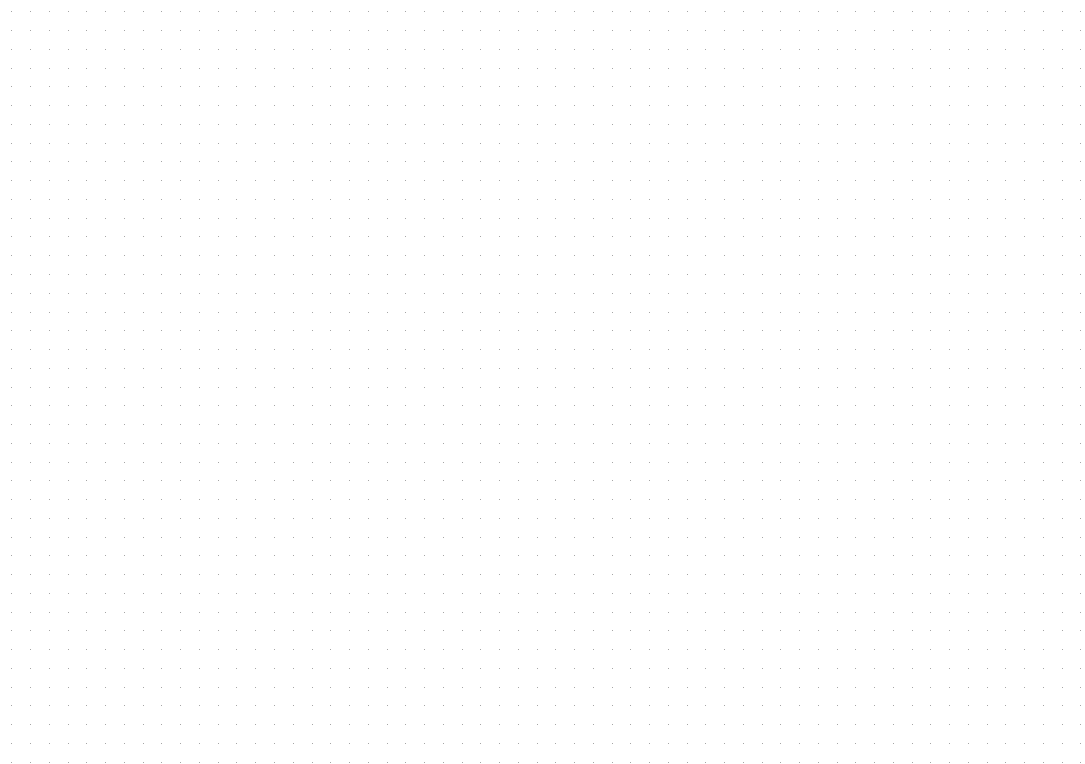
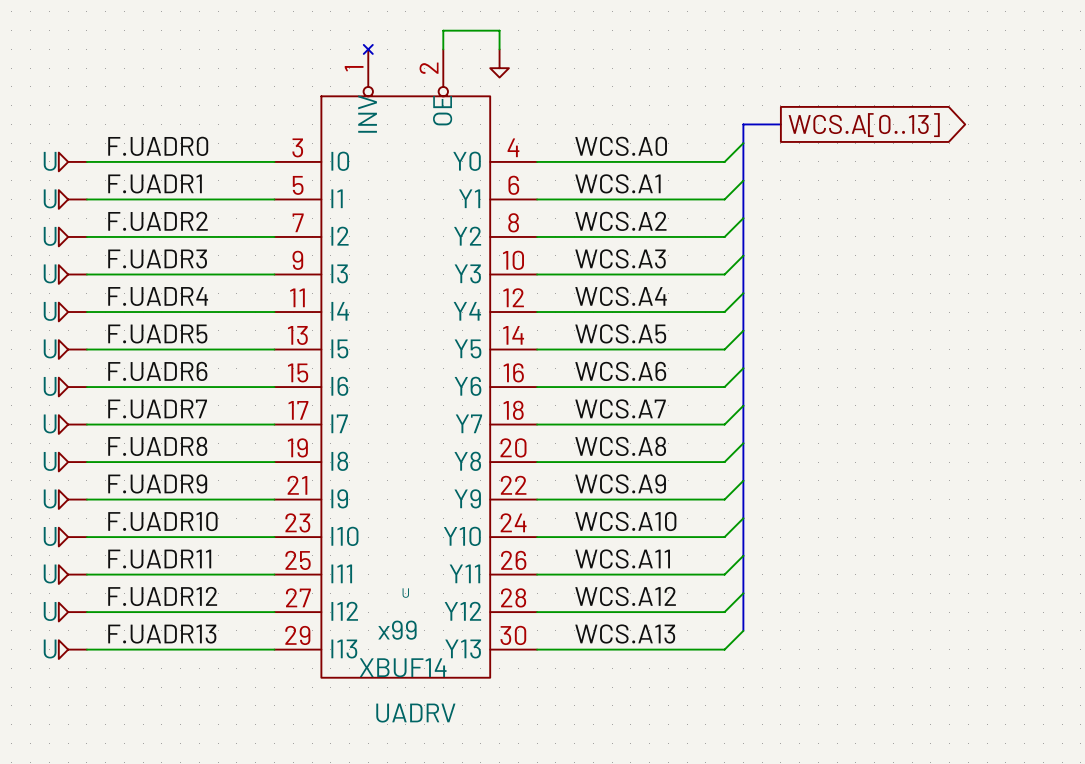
no-connect mark: none -> (368, 49)
wire: none -> (443, 49) (443, 30) (499, 30) (499, 49)
power symbol: none -> (499, 63)
bus: none -> (780, 124) (743, 124) (743, 630)
global label: none -> WCS.A[0..13] (864, 125)
wire: none -> (743, 143) (724, 161) (537, 161)
label: none -> F.UADR0 (158, 146)
label: none -> WCS.A0 (621, 146)
U: none -> (72, 161)
wire: none -> (86, 161) (274, 161)
wire: none -> (743, 180) (724, 199) (537, 199)
label: none -> F.UADR1 (155, 183)
label: none -> WCS.A1 (617, 183)
U: none -> (72, 199)
wire: none -> (86, 199) (274, 199)
wire: none -> (743, 218) (724, 236) (537, 236)
label: none -> F.UADR2 (157, 221)
label: none -> WCS.A2 (620, 221)
U: none -> (72, 236)
wire: none -> (86, 236) (274, 236)
wire: none -> (743, 255) (724, 274) (537, 274)
label: none -> F.UADR3 (157, 258)
label: none -> WCS.A3 (620, 258)
U: none -> (72, 274)
wire: none -> (86, 274) (274, 274)
wire: none -> (743, 293) (724, 312) (537, 312)
label: none -> F.UADR4 (158, 296)
label: none -> WCS.A4 (621, 296)
U: none -> (72, 312)
wire: none -> (86, 312) (274, 312)
wire: none -> (743, 330) (724, 349) (537, 349)
label: none -> F.UADR5 (157, 334)
label: none -> WCS.A5 (620, 333)
U: none -> (72, 349)
wire: none -> (86, 349) (274, 349)
U: none -> XBUF14 (405, 363)
wire: none -> (743, 368) (724, 387) (537, 387)
label: none -> F.UADR6 (157, 371)
label: none -> WCS.A6 (620, 371)
U: none -> (72, 387)
wire: none -> (86, 387) (274, 387)
wire: none -> (743, 405) (724, 424) (537, 424)
label: none -> F.UADR7 (157, 409)
label: none -> WCS.A7 (620, 408)
U: none -> (72, 424)
wire: none -> (86, 424) (274, 424)
wire: none -> (743, 443) (724, 462) (537, 462)
label: none -> F.UADR8 (157, 446)
label: none -> WCS.A8 (620, 446)
U: none -> (72, 462)
wire: none -> (86, 462) (274, 462)
wire: none -> (743, 480) (724, 499) (537, 499)
label: none -> F.UADR9 (157, 483)
label: none -> WCS.A9 (620, 483)
U: none -> (72, 499)
wire: none -> (86, 499) (274, 499)
wire: none -> (743, 518) (724, 537) (537, 537)
label: none -> F.UADR10 (162, 521)
label: none -> WCS.A10 (625, 521)
U: none -> (72, 537)
wire: none -> (86, 537) (274, 537)
wire: none -> (743, 555) (724, 574) (537, 574)
label: none -> F.UADR11 (159, 559)
label: none -> WCS.A11 (622, 558)
U: none -> (72, 574)
wire: none -> (86, 574) (274, 574)
wire: none -> (743, 593) (724, 612) (537, 612)
label: none -> F.UADR12 (162, 596)
label: none -> WCS.A12 (625, 596)
U: none -> (72, 612)
wire: none -> (86, 612) (274, 612)
wire: none -> (743, 630) (724, 649) (537, 649)
label: none -> F.UADR13 (162, 634)
label: none -> WCS.A13 (625, 634)
U: none -> (72, 649)
wire: none -> (86, 649) (274, 649)

